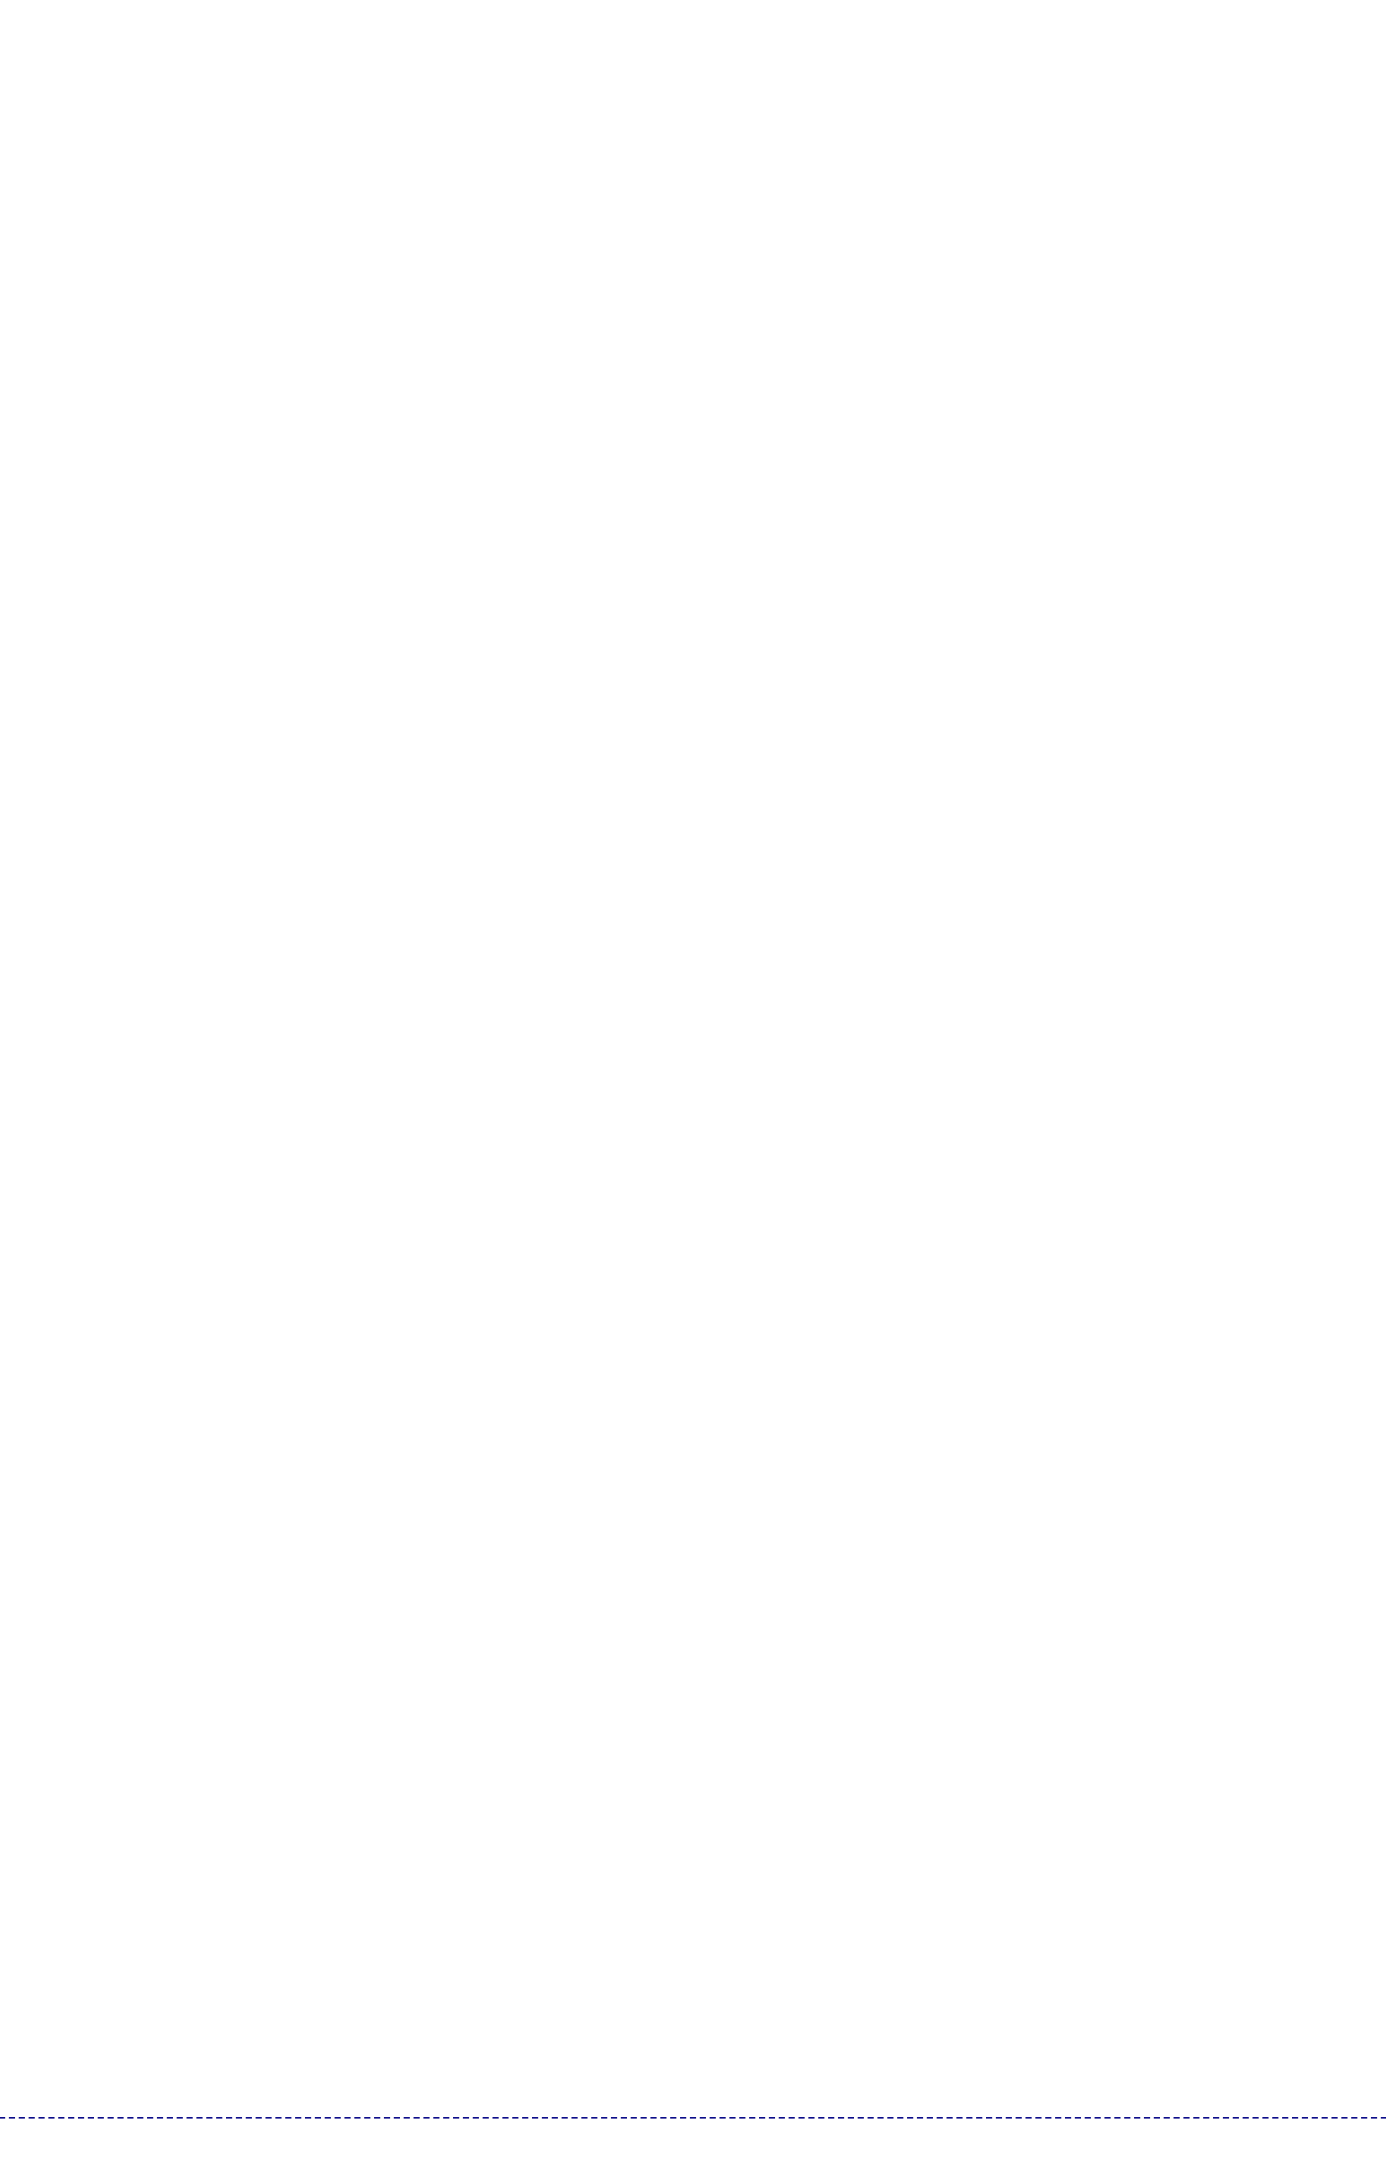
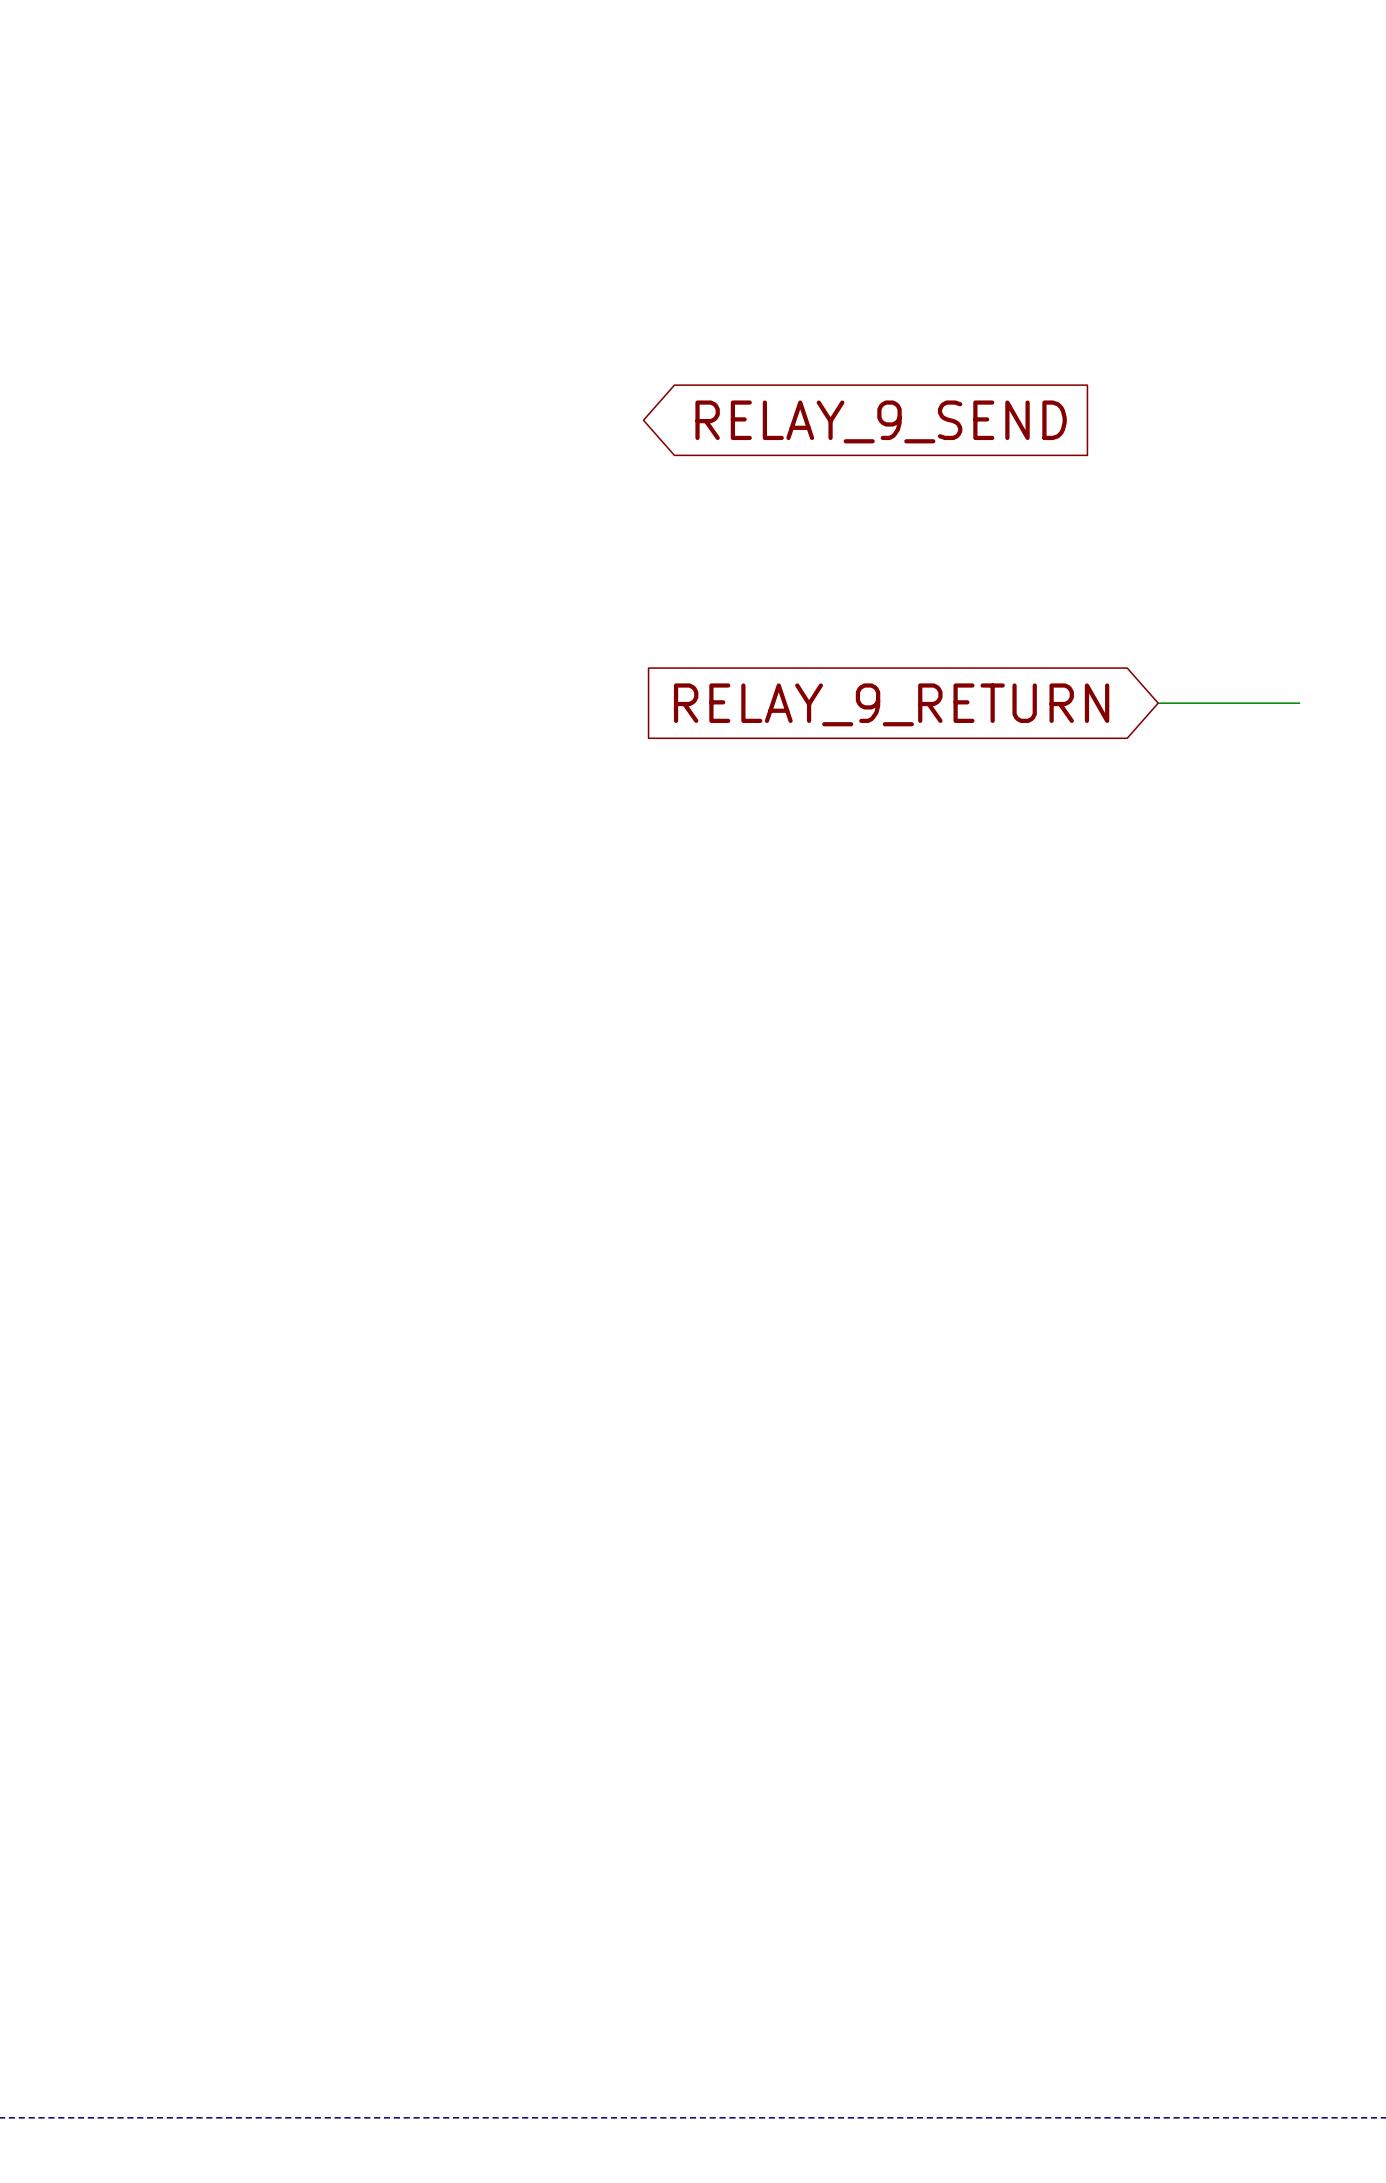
global label: none -> RELAY_9_SEND (881, 421)
wire: none -> (1158, 703) (1299, 703)
global label: none -> RELAY_9_RETURN (891, 704)

